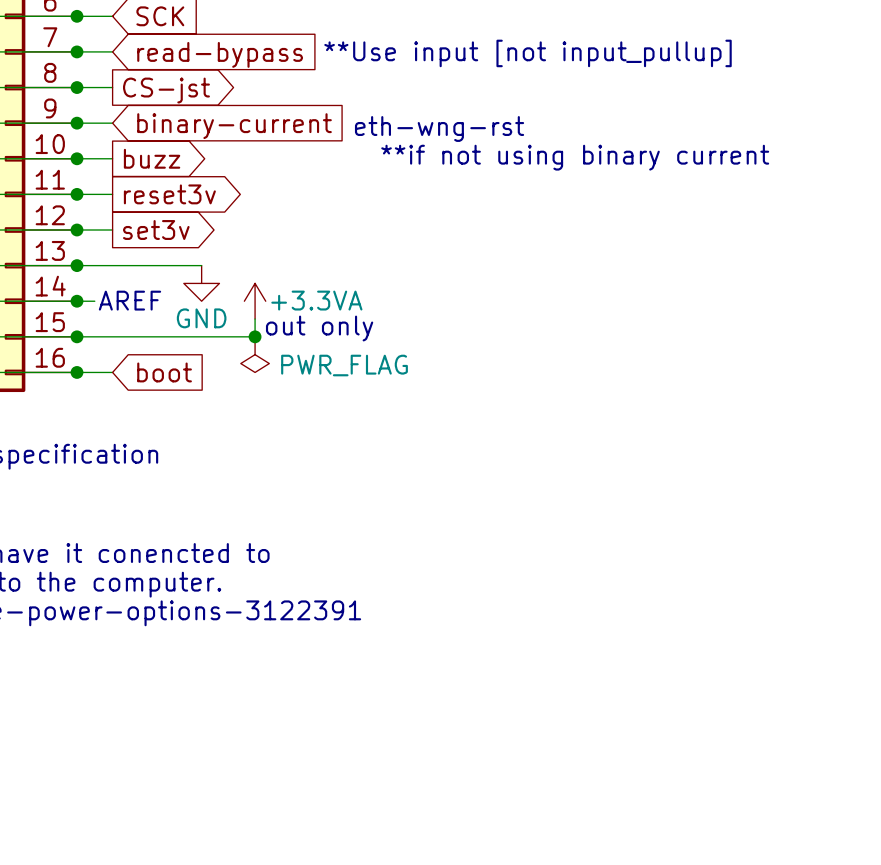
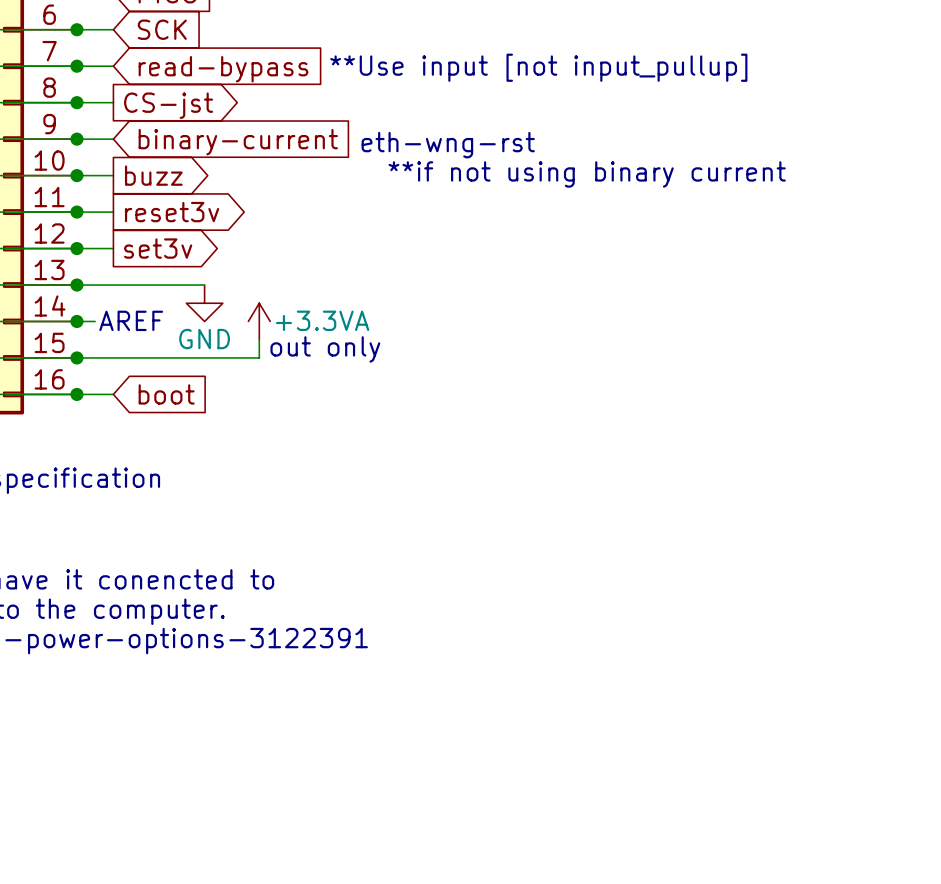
junction: (255, 336) -> none
power symbol: PWR_FLAG (255, 354) -> none

